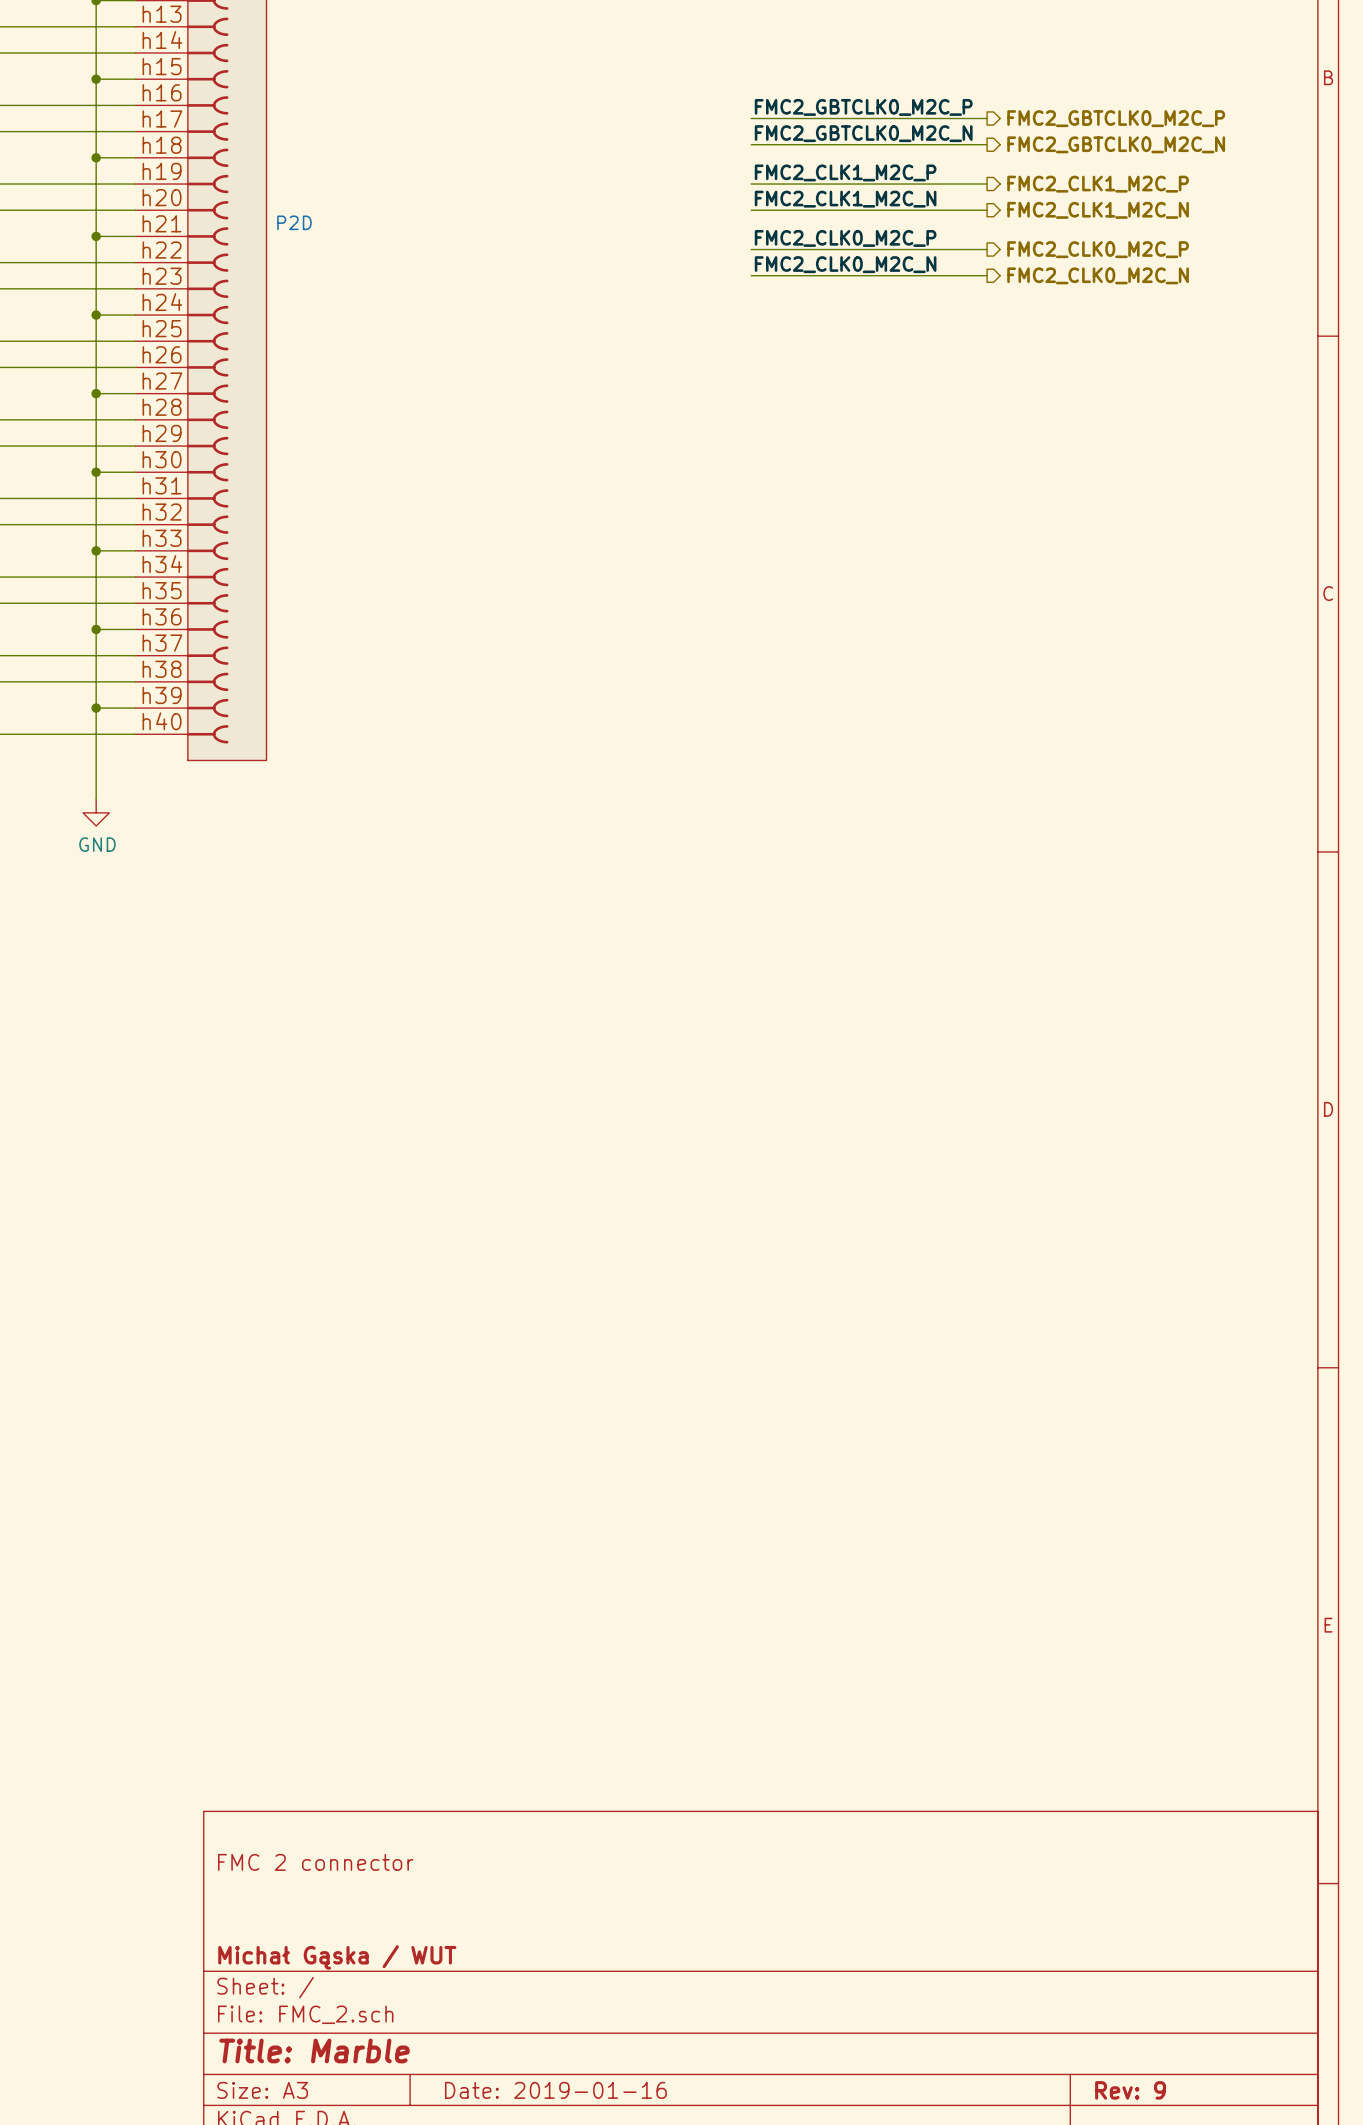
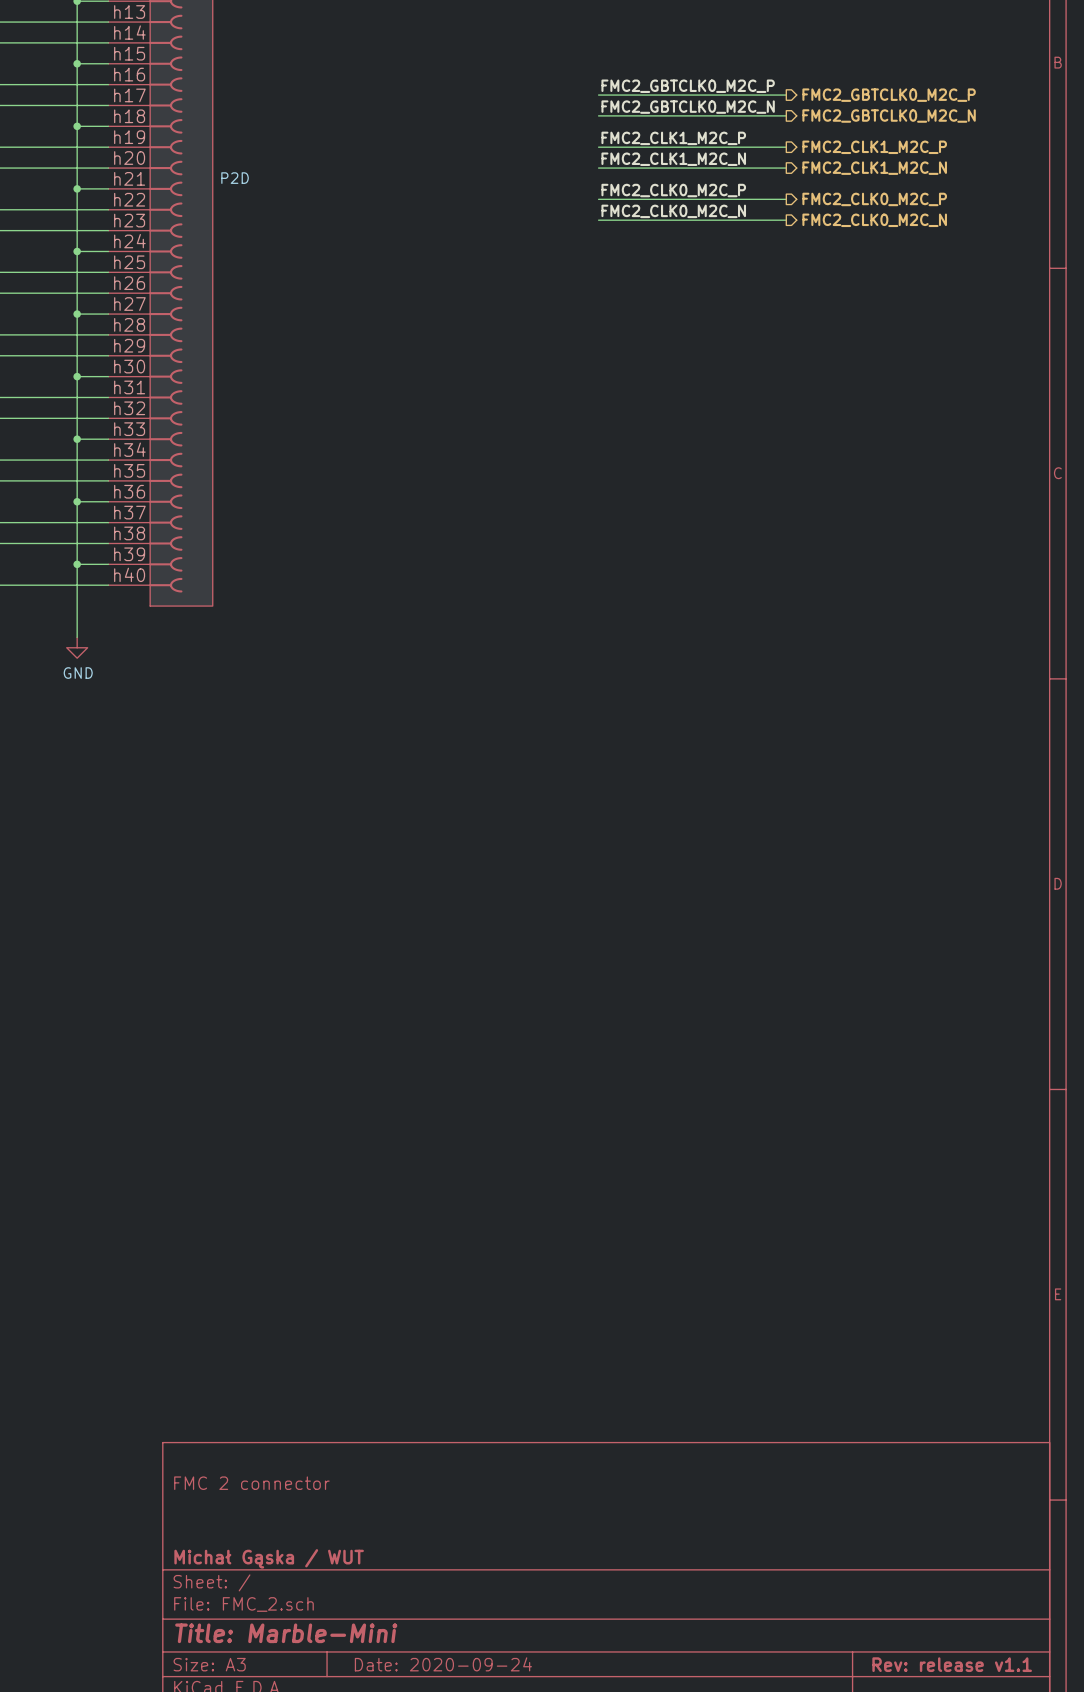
title block: Title: Marble (314, 2050) -> Title: Marble-Mini (286, 1633)
title block: Date: 2019-01-16 (555, 2090) -> Date: 2020-09-24 (443, 1664)
title block: Rev: 9 (1130, 2090) -> Rev: release v1.1 (952, 1664)

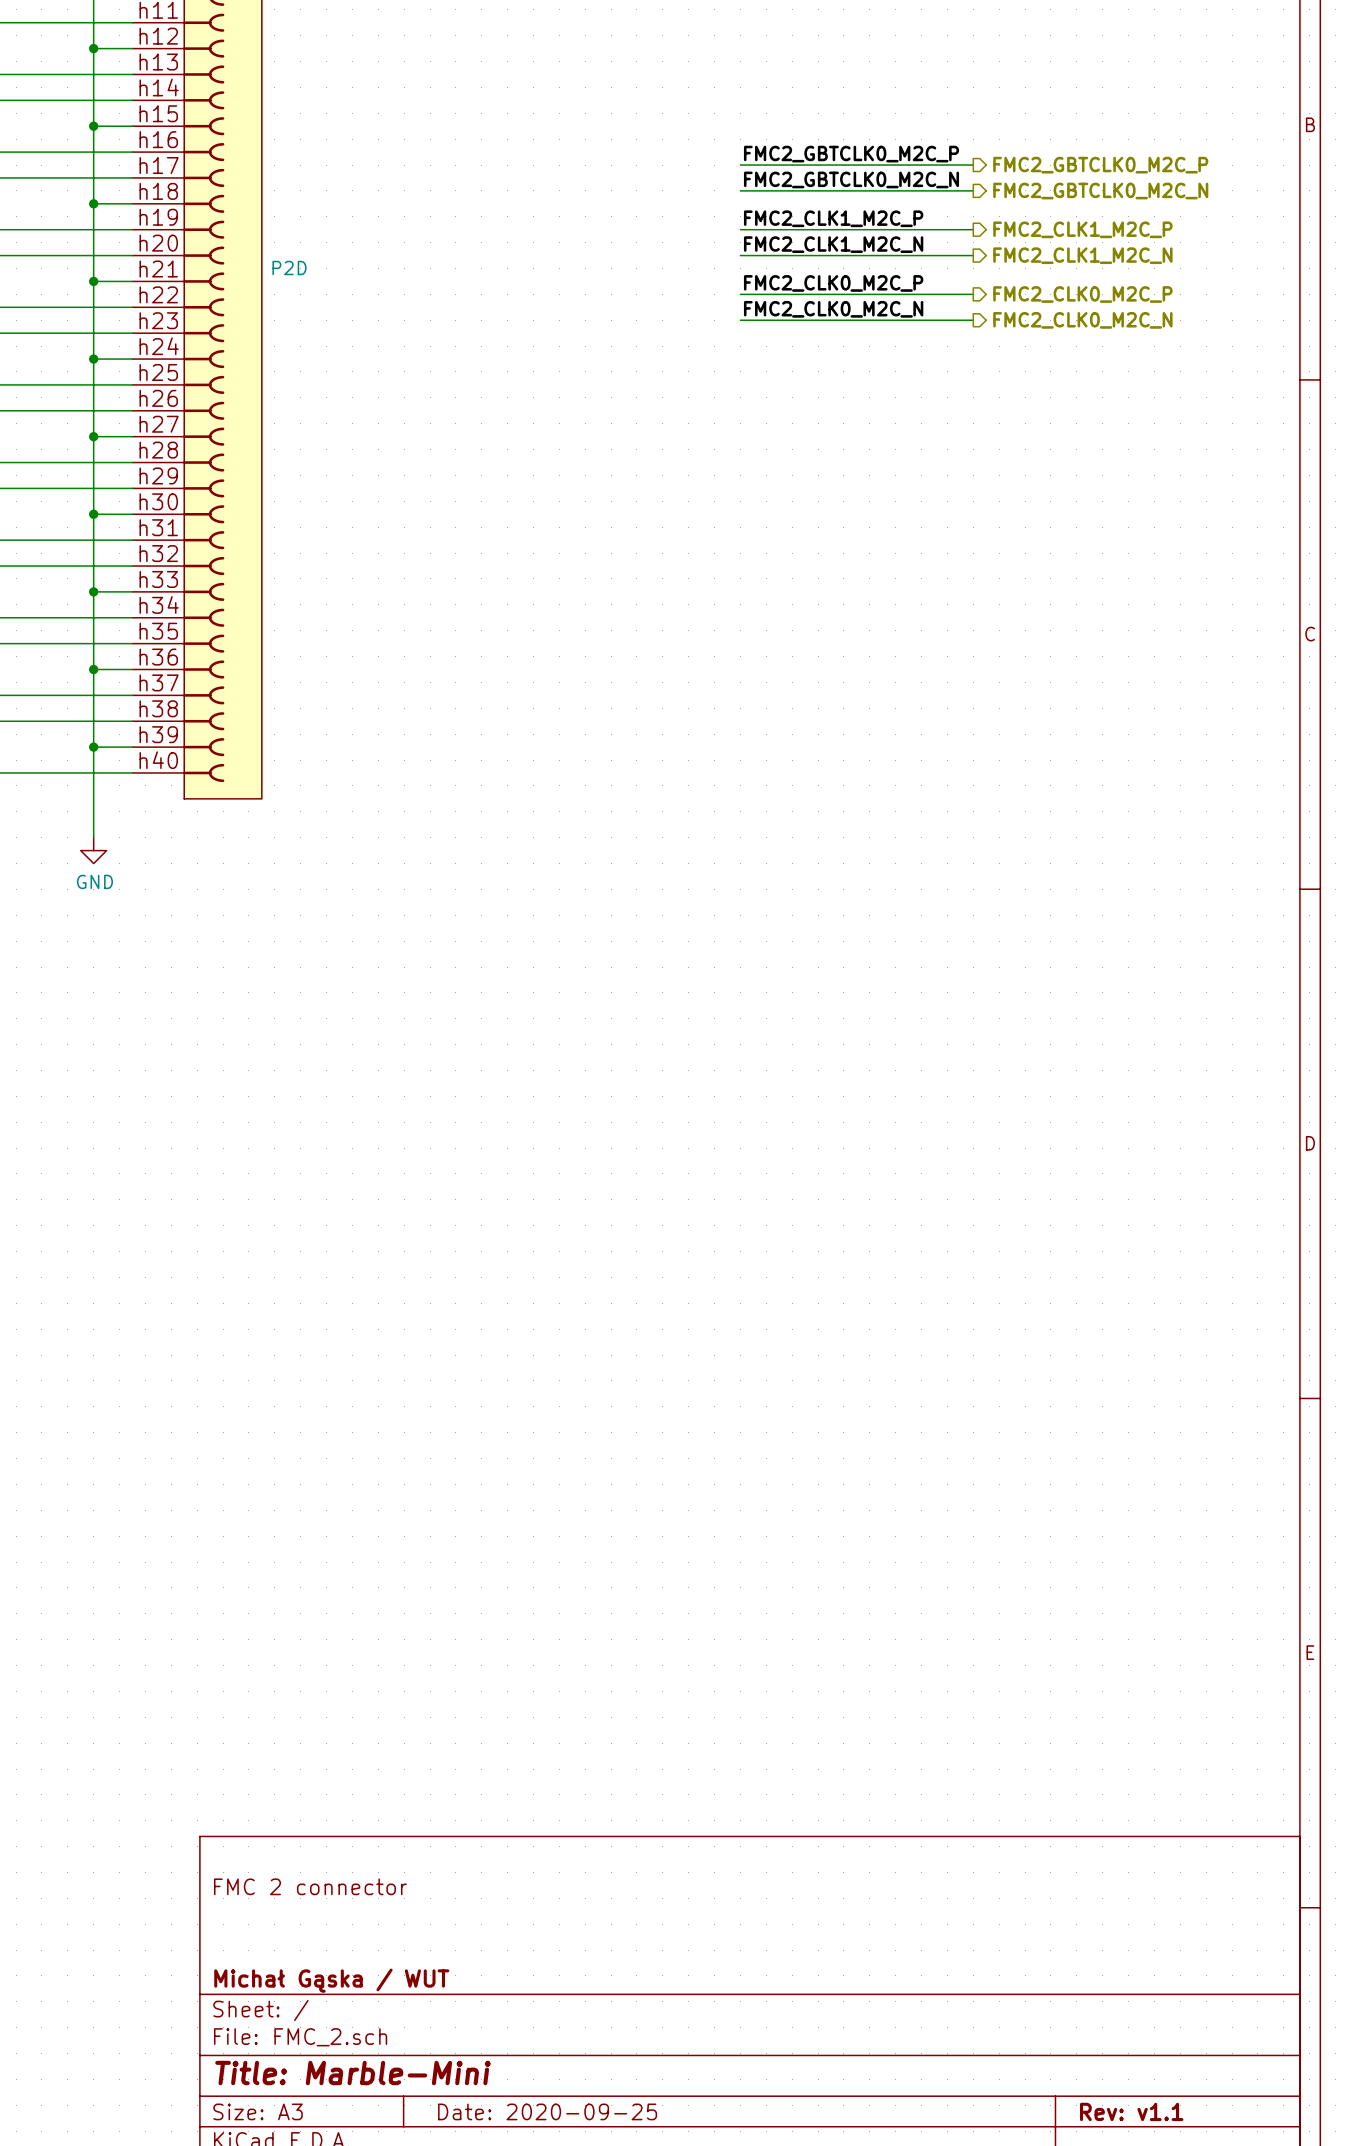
title block: Date: 2020-09-24 (443, 1664) -> Date: 2020-09-25 (547, 2111)
title block: Rev: release v1.1 (952, 1664) -> Rev: v1.1 (1131, 2111)

